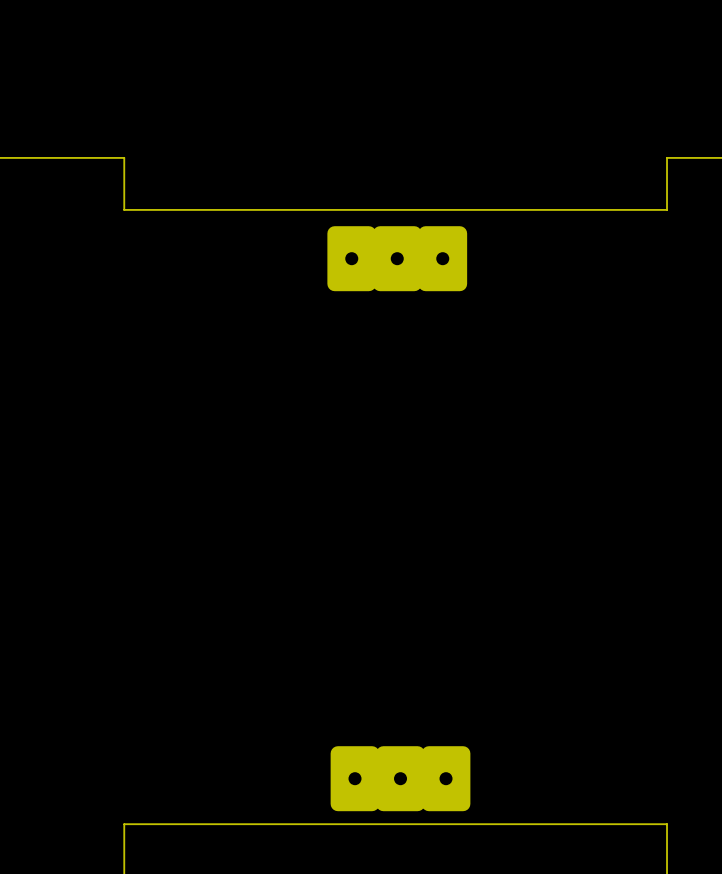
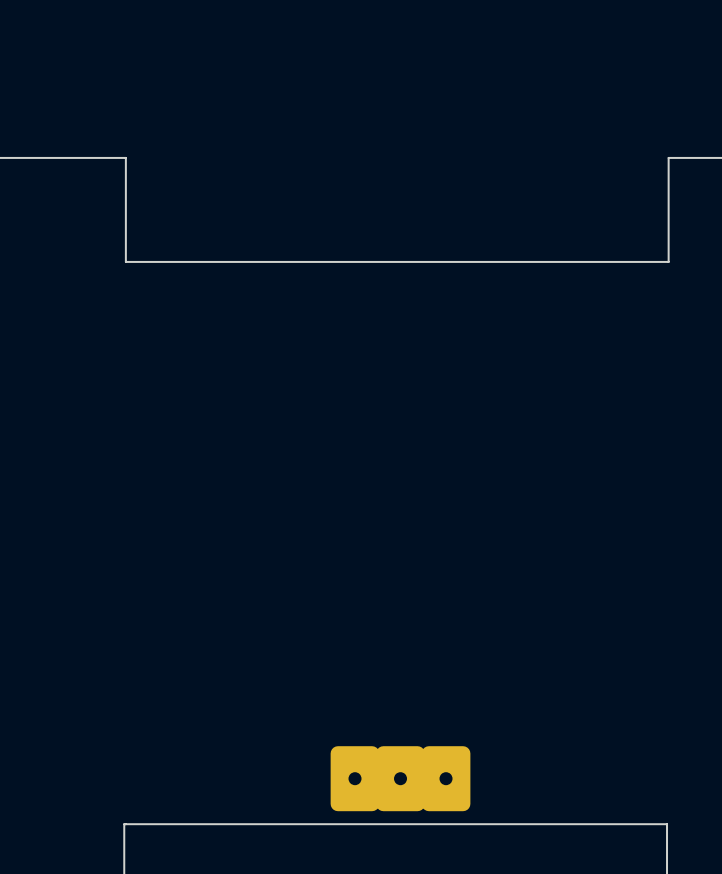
board edge: (124, 157) (124, 209) (667, 209) (667, 157) (668, 157) -> (124, 157) (125, 157) (125, 261) (668, 261) (668, 157)
part: (397, 258) -> none

